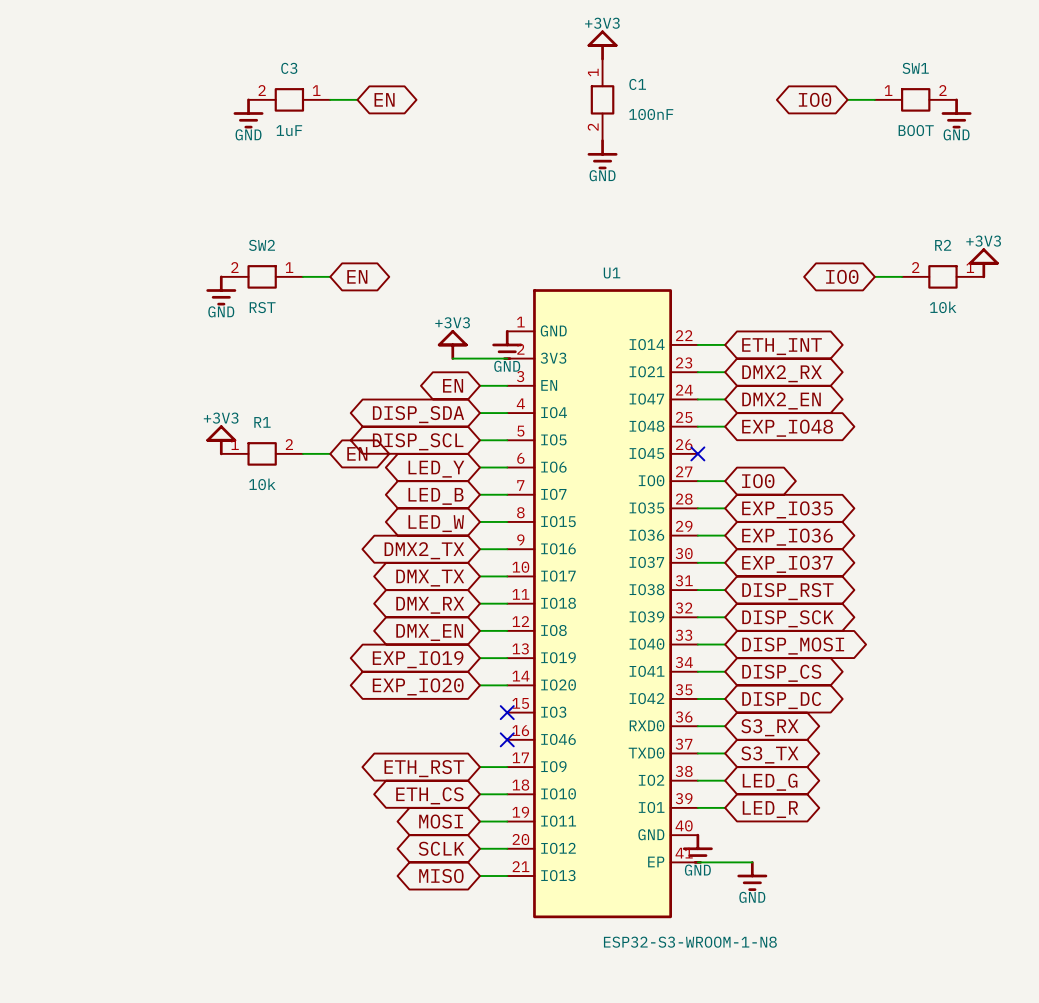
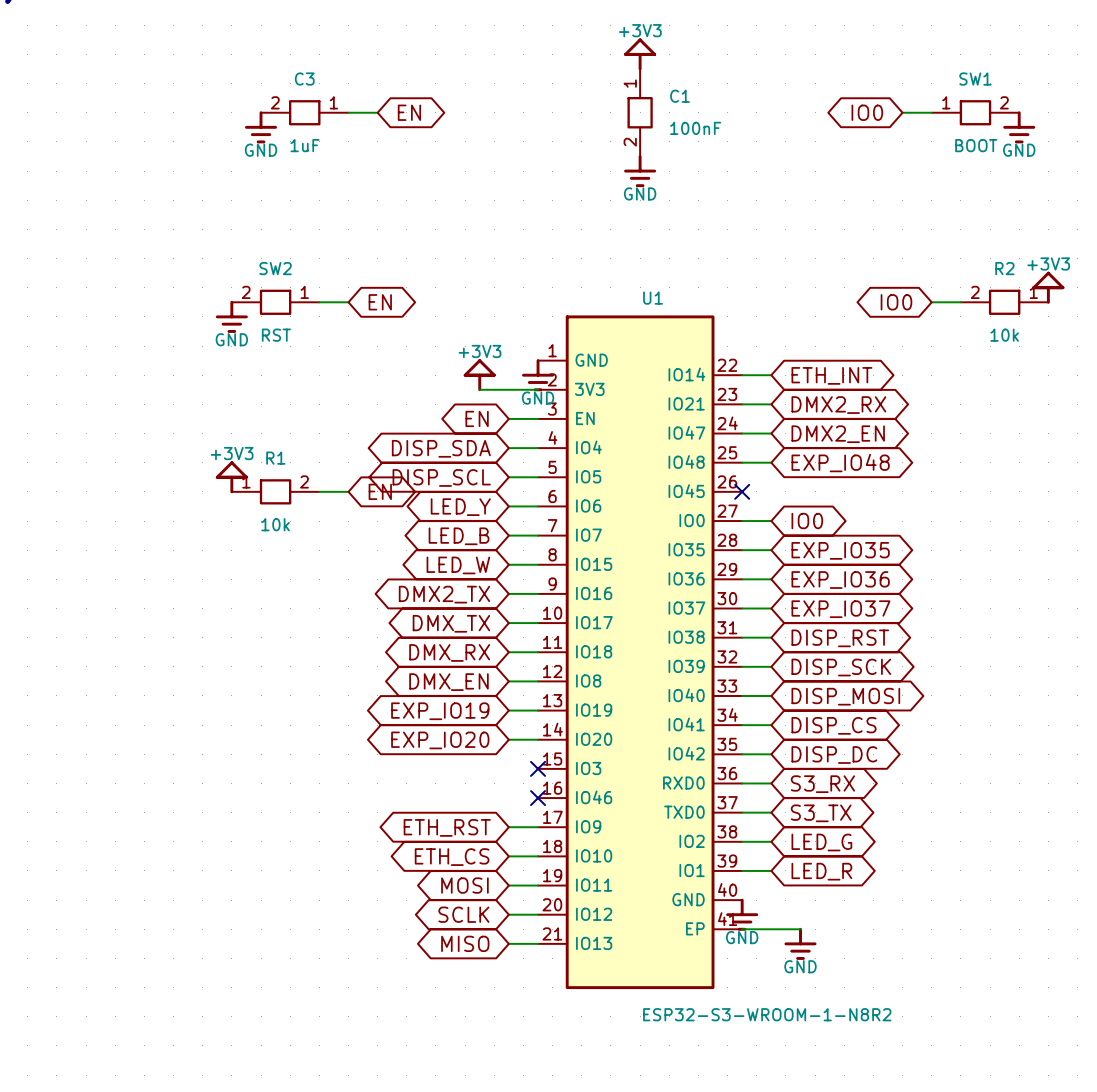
U1 value: ESP32-S3-WROOM-1-N8 (690, 942) -> ESP32-S3-WROOM-1-N8R2 (767, 1014)

